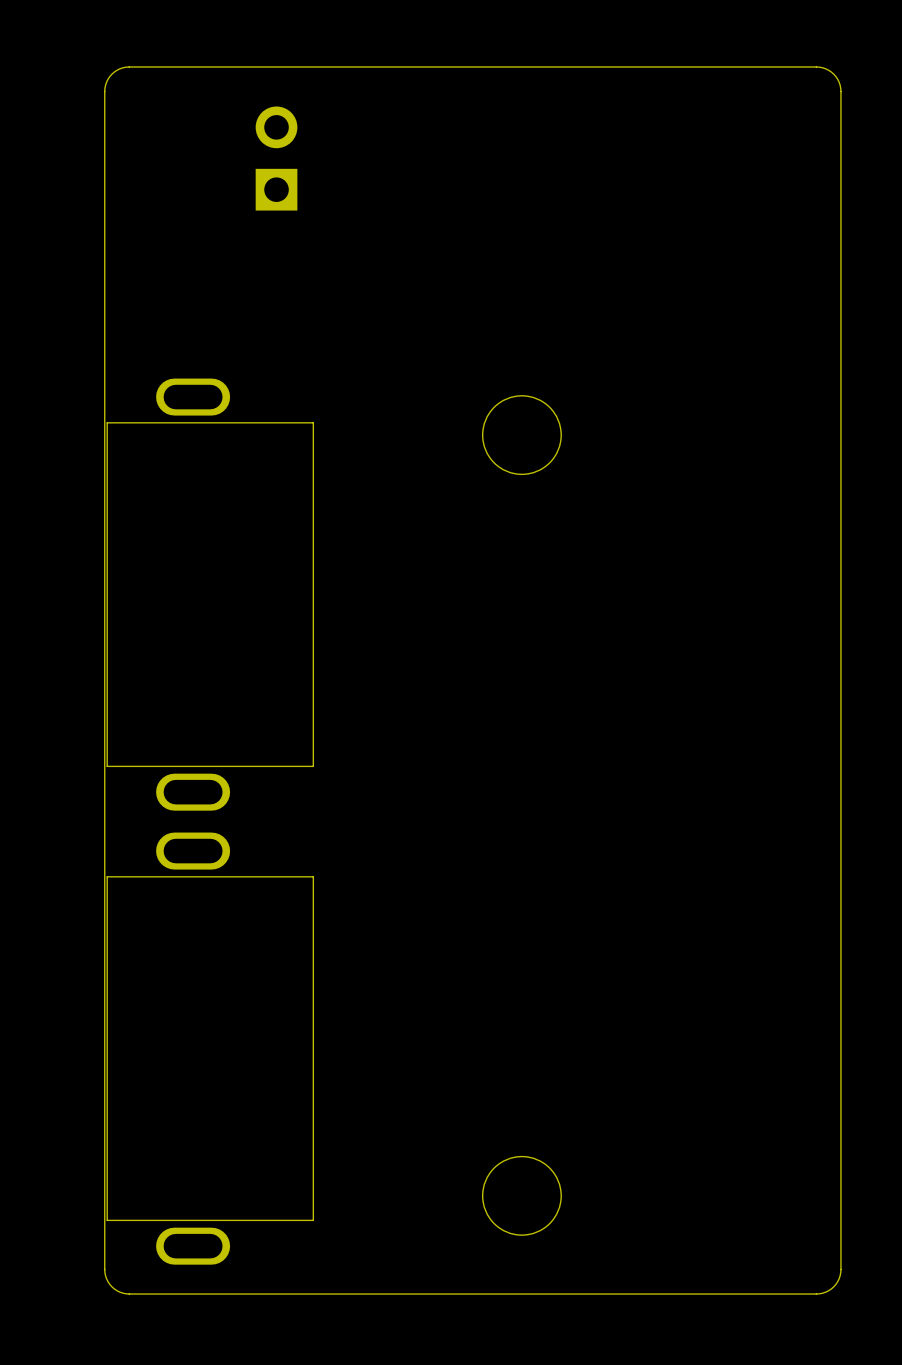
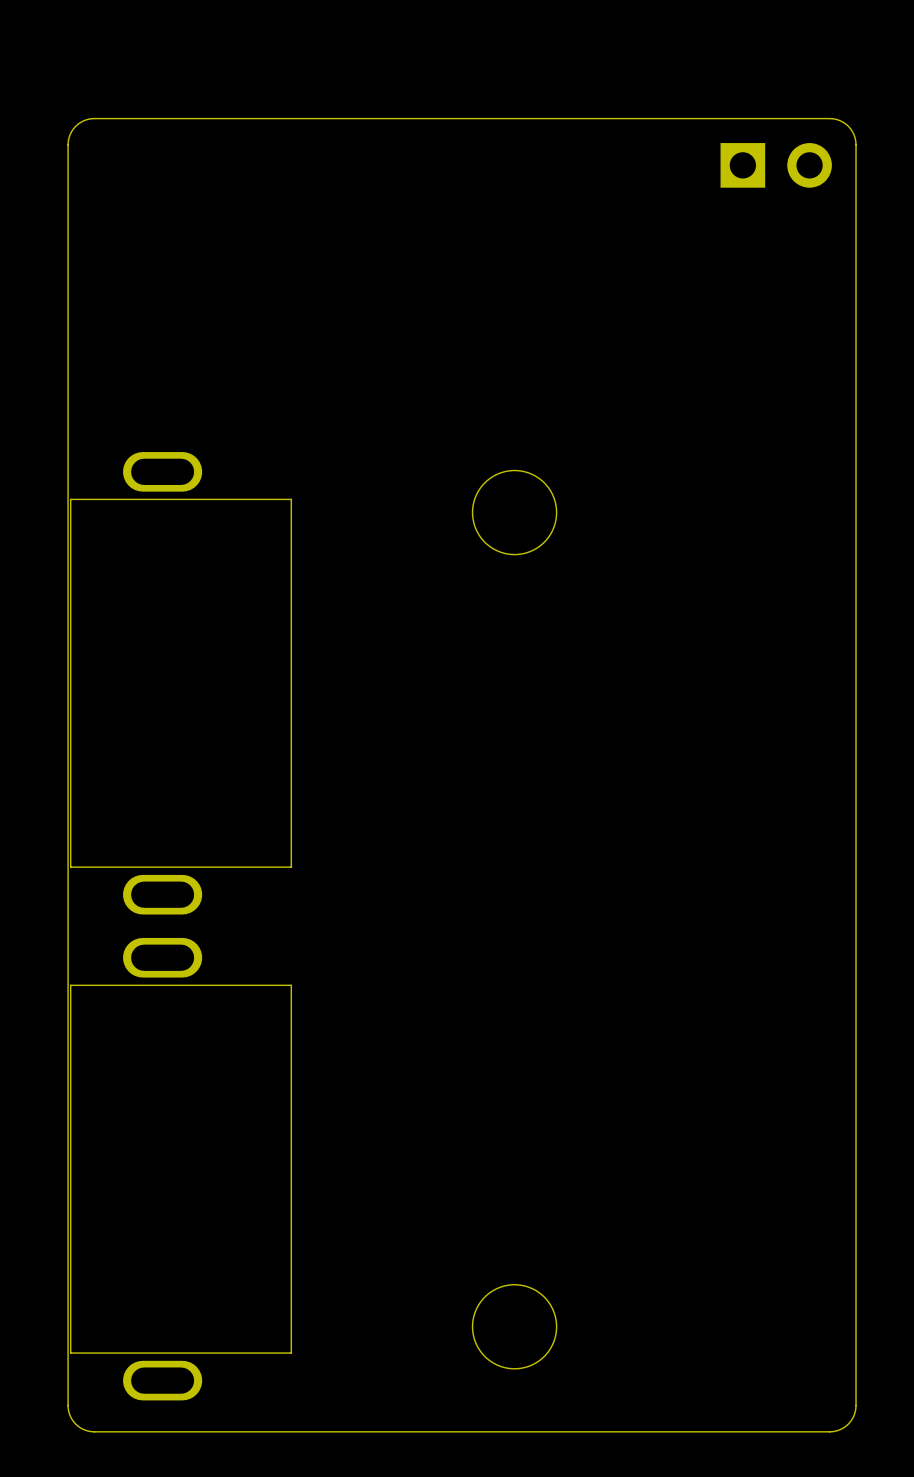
part rotation: 0° (276, 158) -> 90° clockwise (776, 165)
part position: (276, 158) -> (776, 165)

